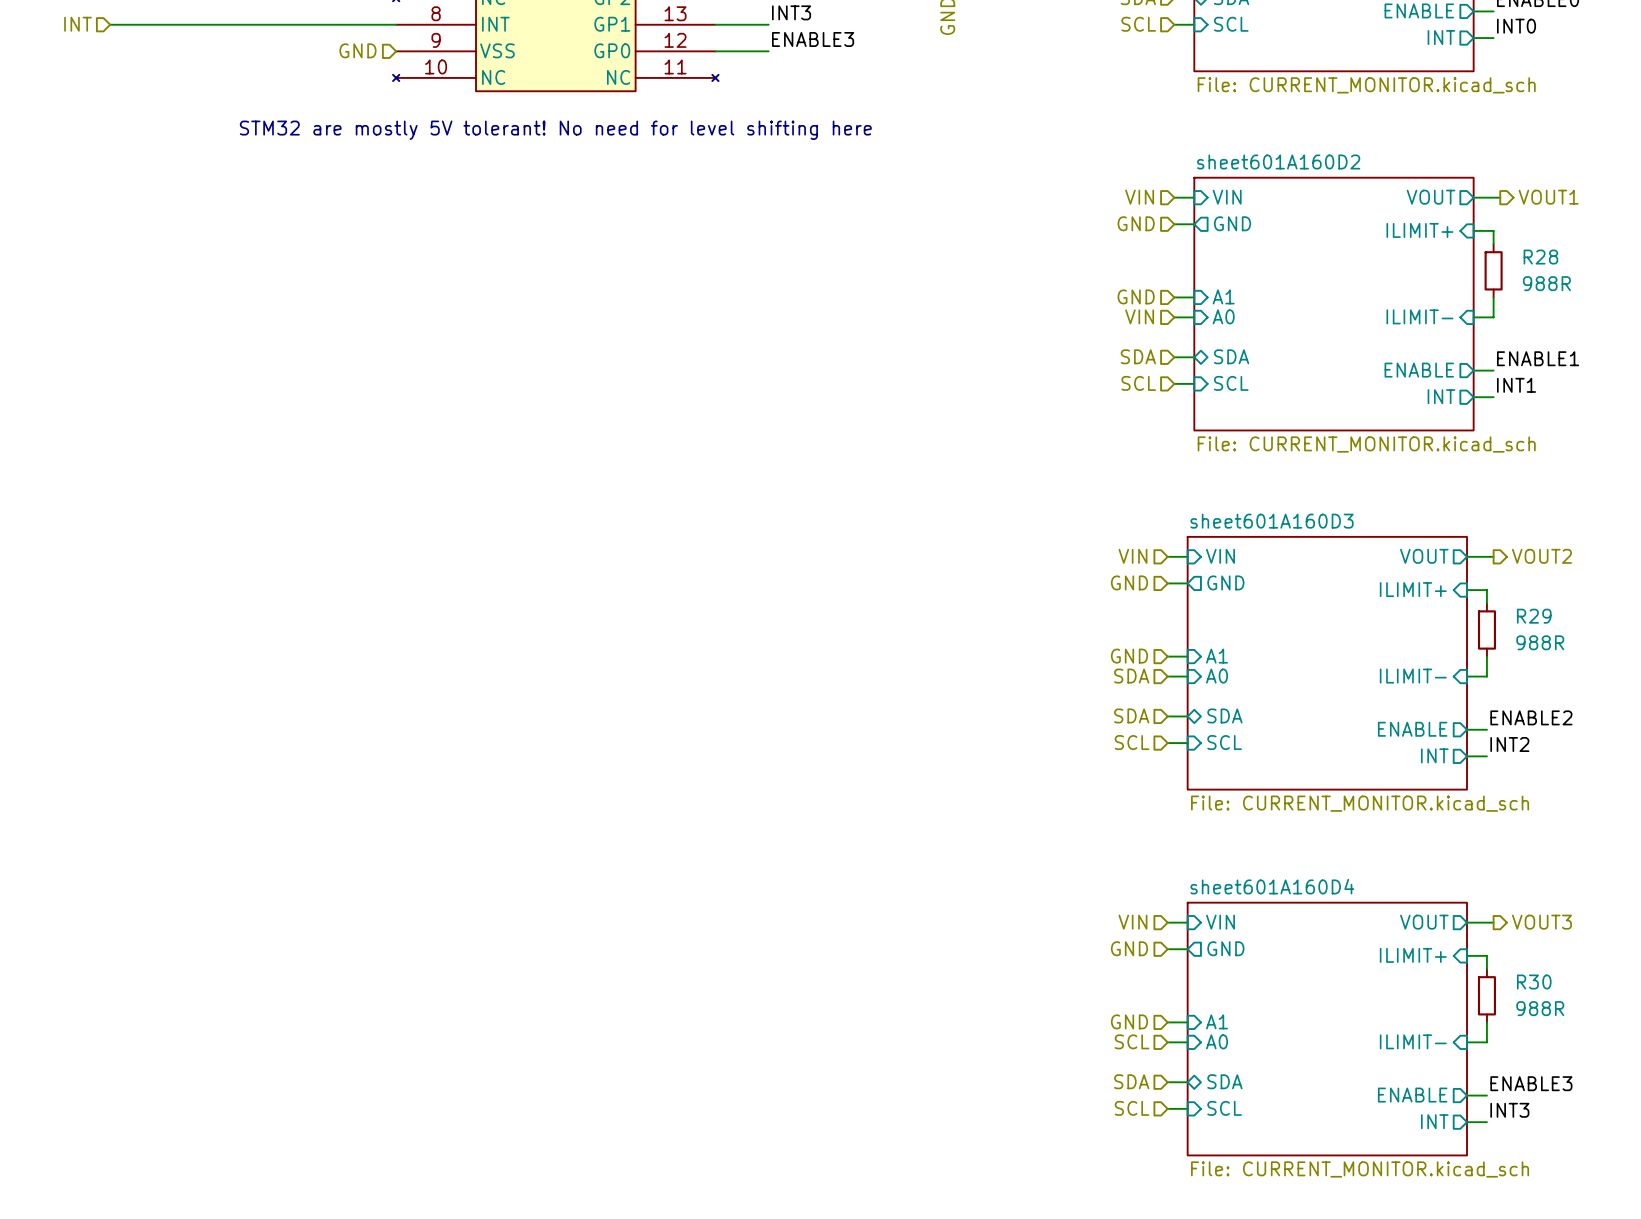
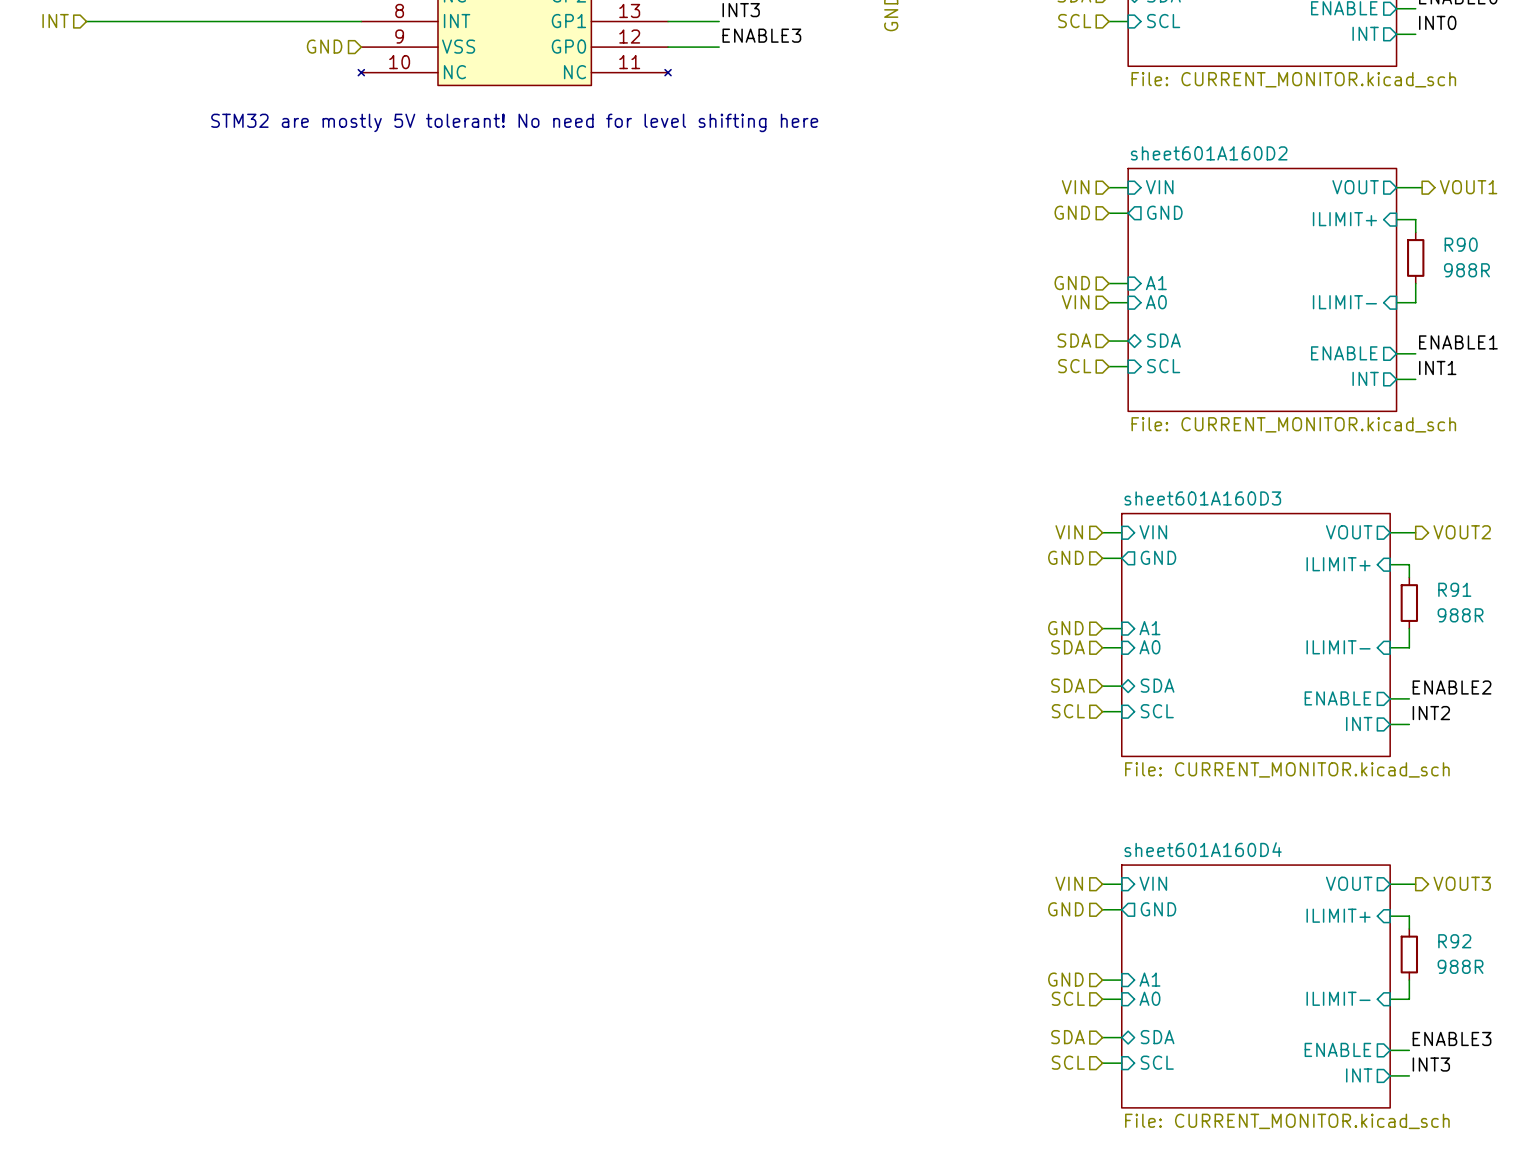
R28 name: R28 (1540, 257) -> R90 (1461, 244)
R29 name: R29 (1534, 616) -> R91 (1454, 589)
R30 name: R30 (1534, 982) -> R92 (1454, 941)

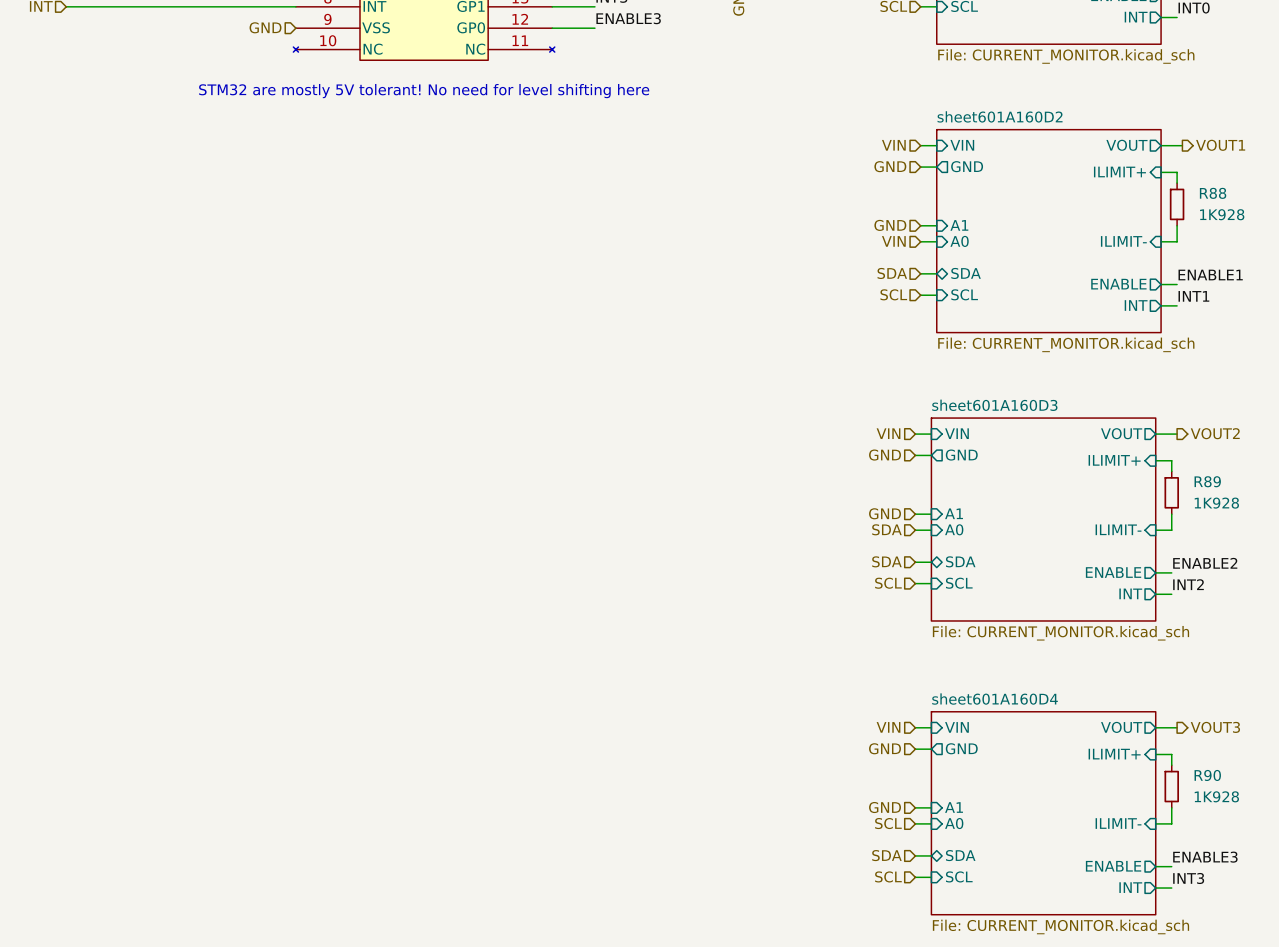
R90 name: R90 (1461, 244) -> R88 (1213, 193)
R90 value: 988R (1466, 270) -> 1K928 (1222, 214)
R91 name: R91 (1454, 589) -> R89 (1207, 481)
R91 value: 988R (1460, 615) -> 1K928 (1216, 503)
R92 name: R92 (1454, 941) -> R90 (1207, 775)
R92 value: 988R (1460, 966) -> 1K928 (1216, 796)

